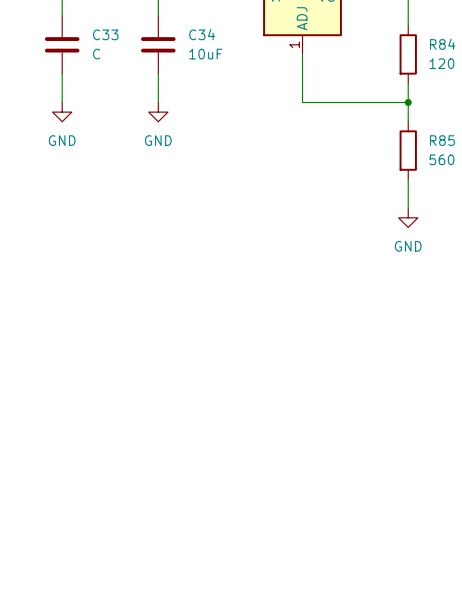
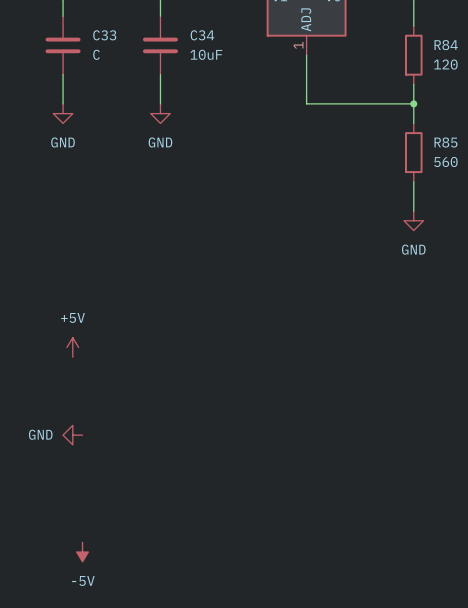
power symbol: none -> +5V (72, 347)
power symbol: none -> GND (72, 435)
power symbol: none -> -5V (82, 552)

